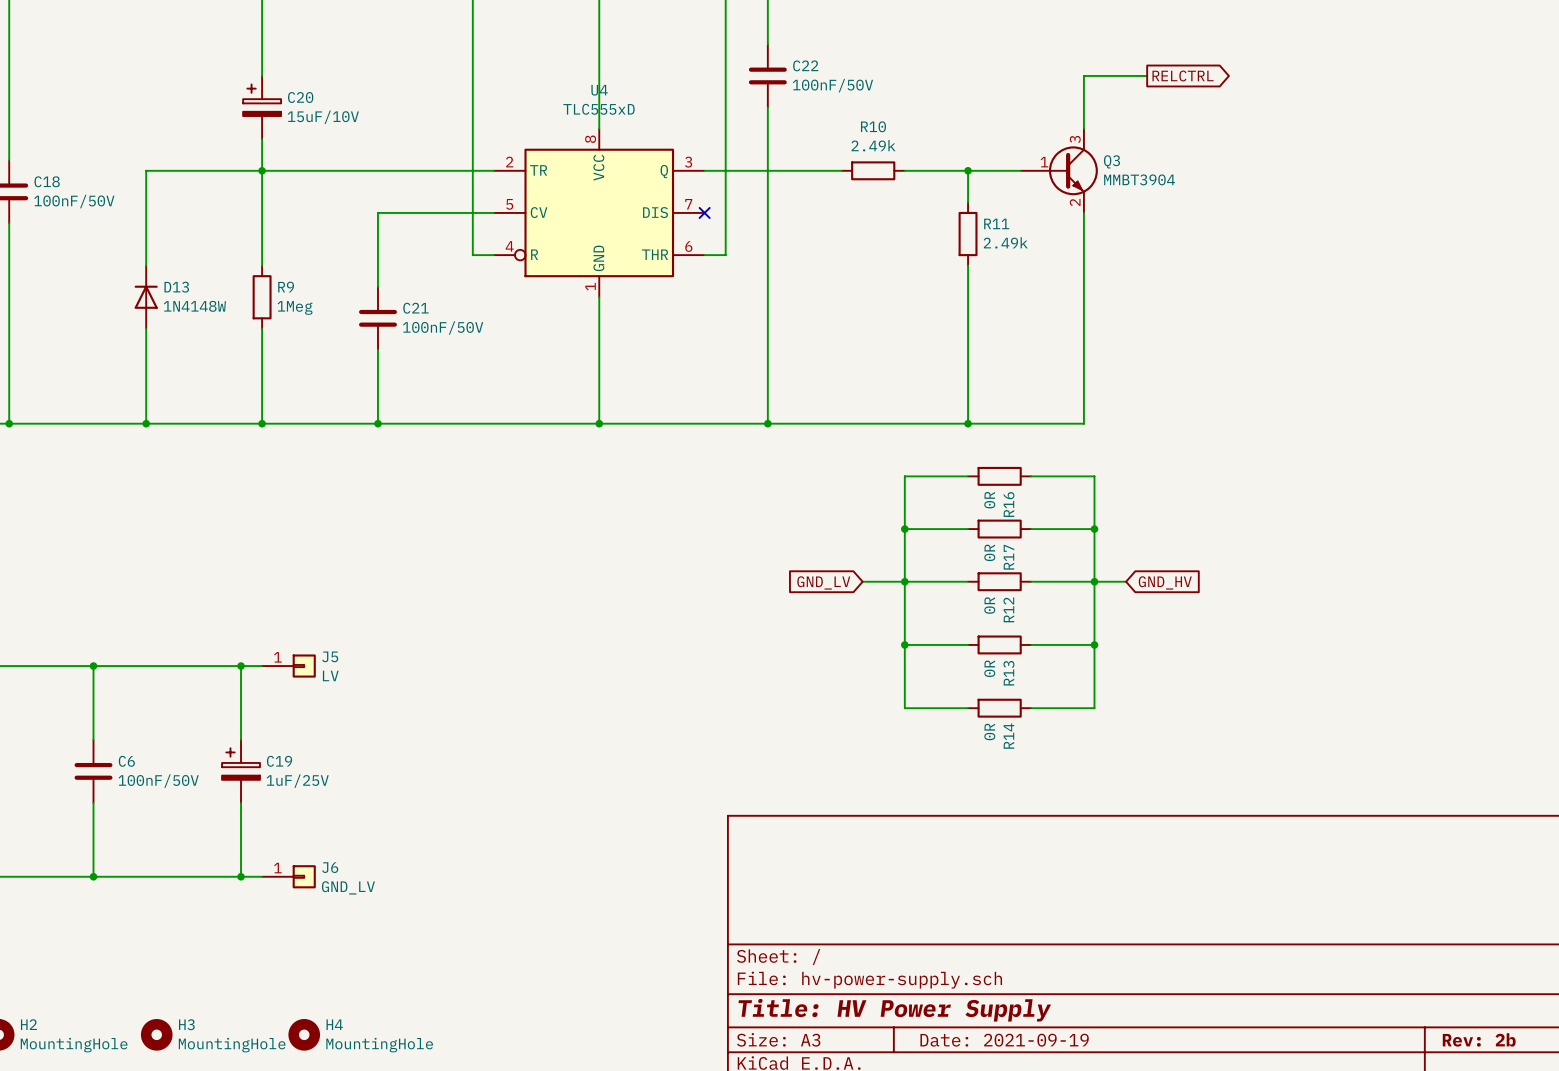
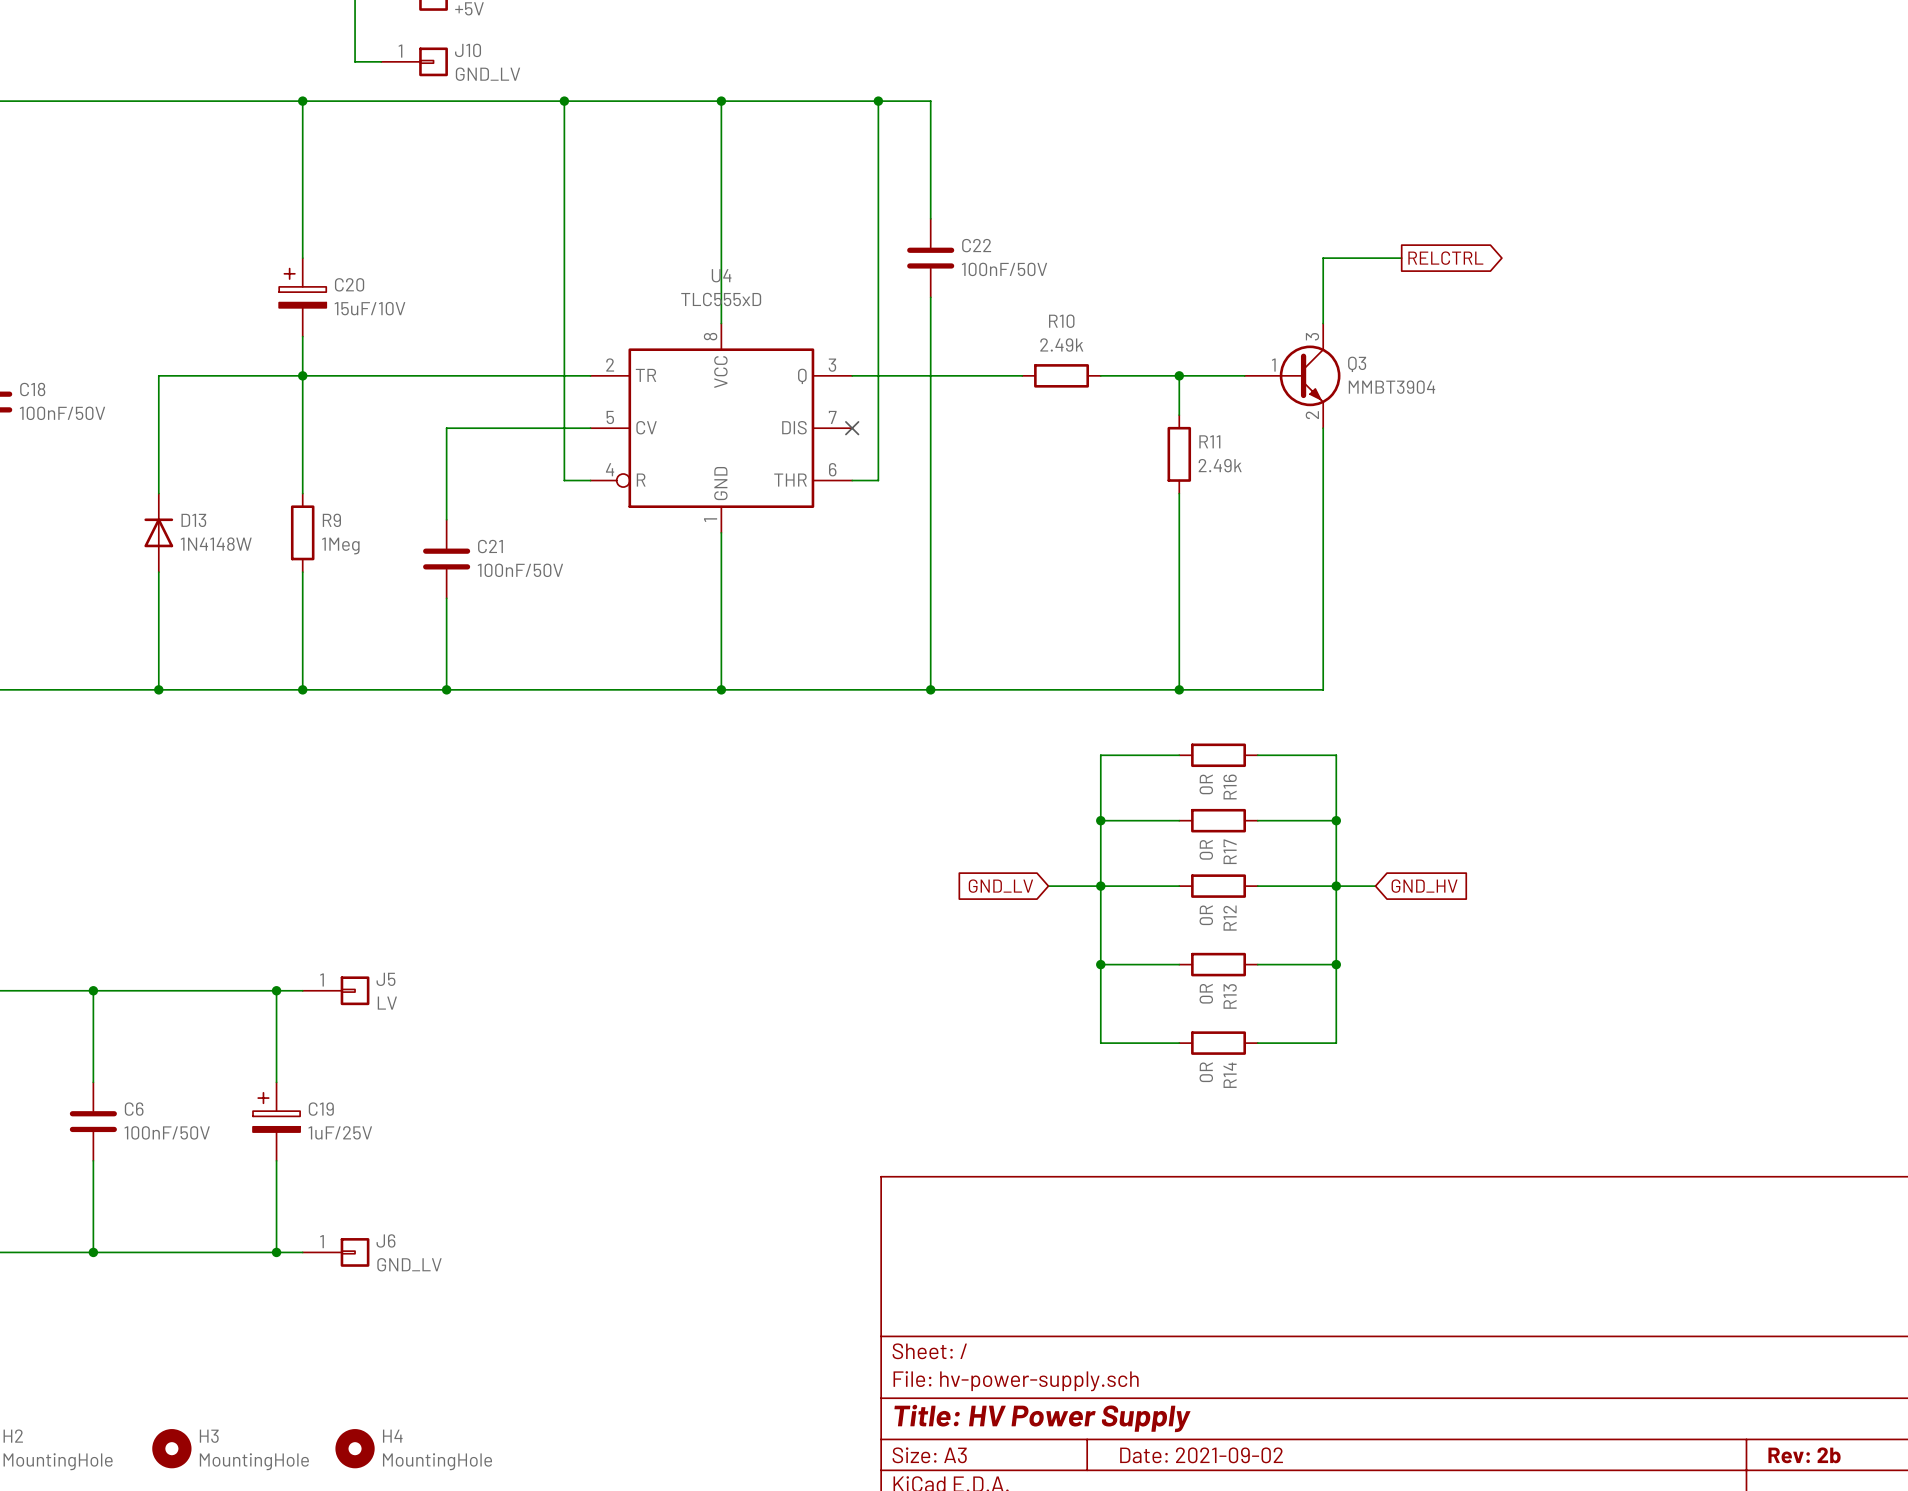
title block: Date: 2021-09-19 (1004, 1040) -> Date: 2021-09-02 (1201, 1455)

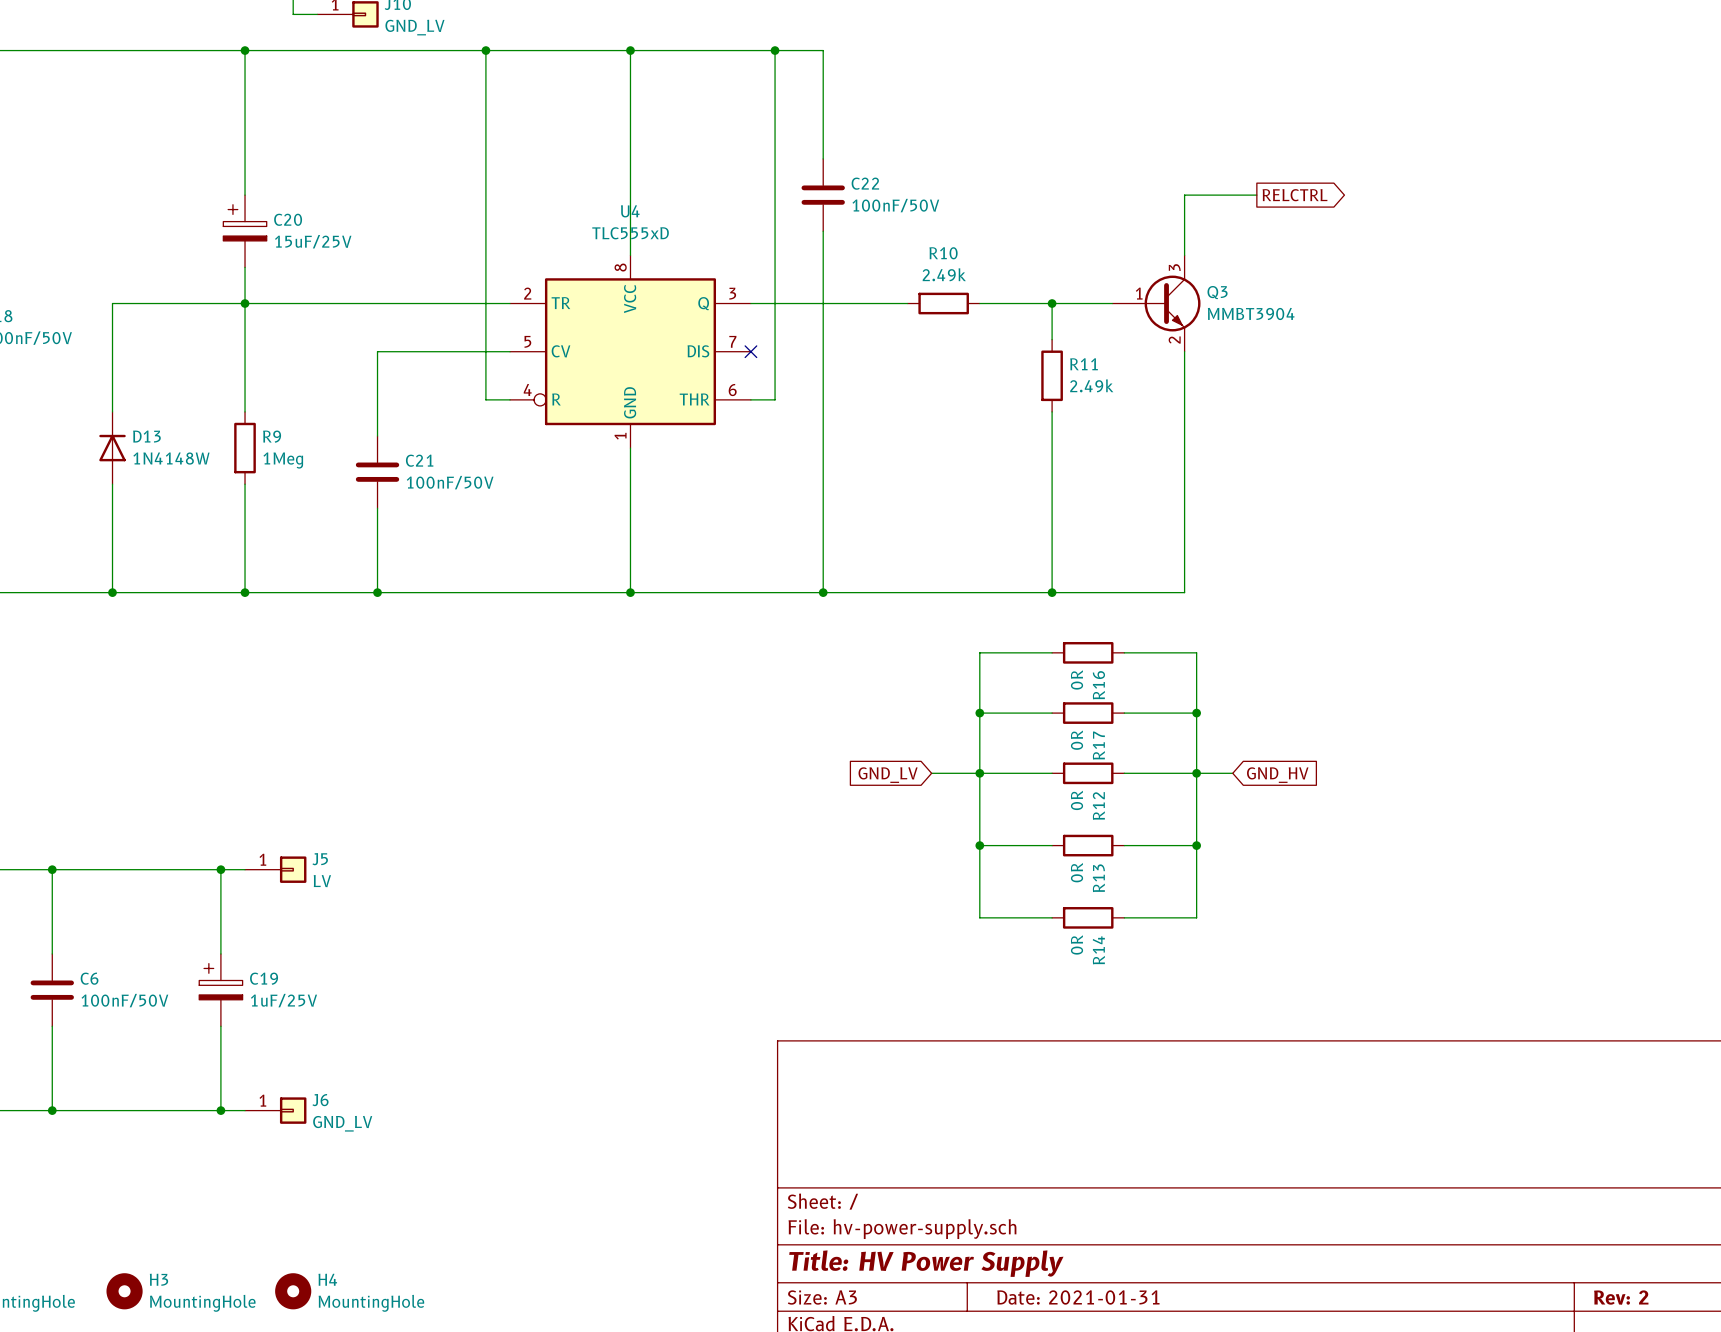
C20 value: 15uF/10V (370, 308) -> 15uF/25V (313, 241)
title block: Date: 2021-09-02 (1201, 1455) -> Date: 2021-01-31 (1078, 1297)
title block: Rev: 2b (1804, 1455) -> Rev: 2 (1621, 1297)

